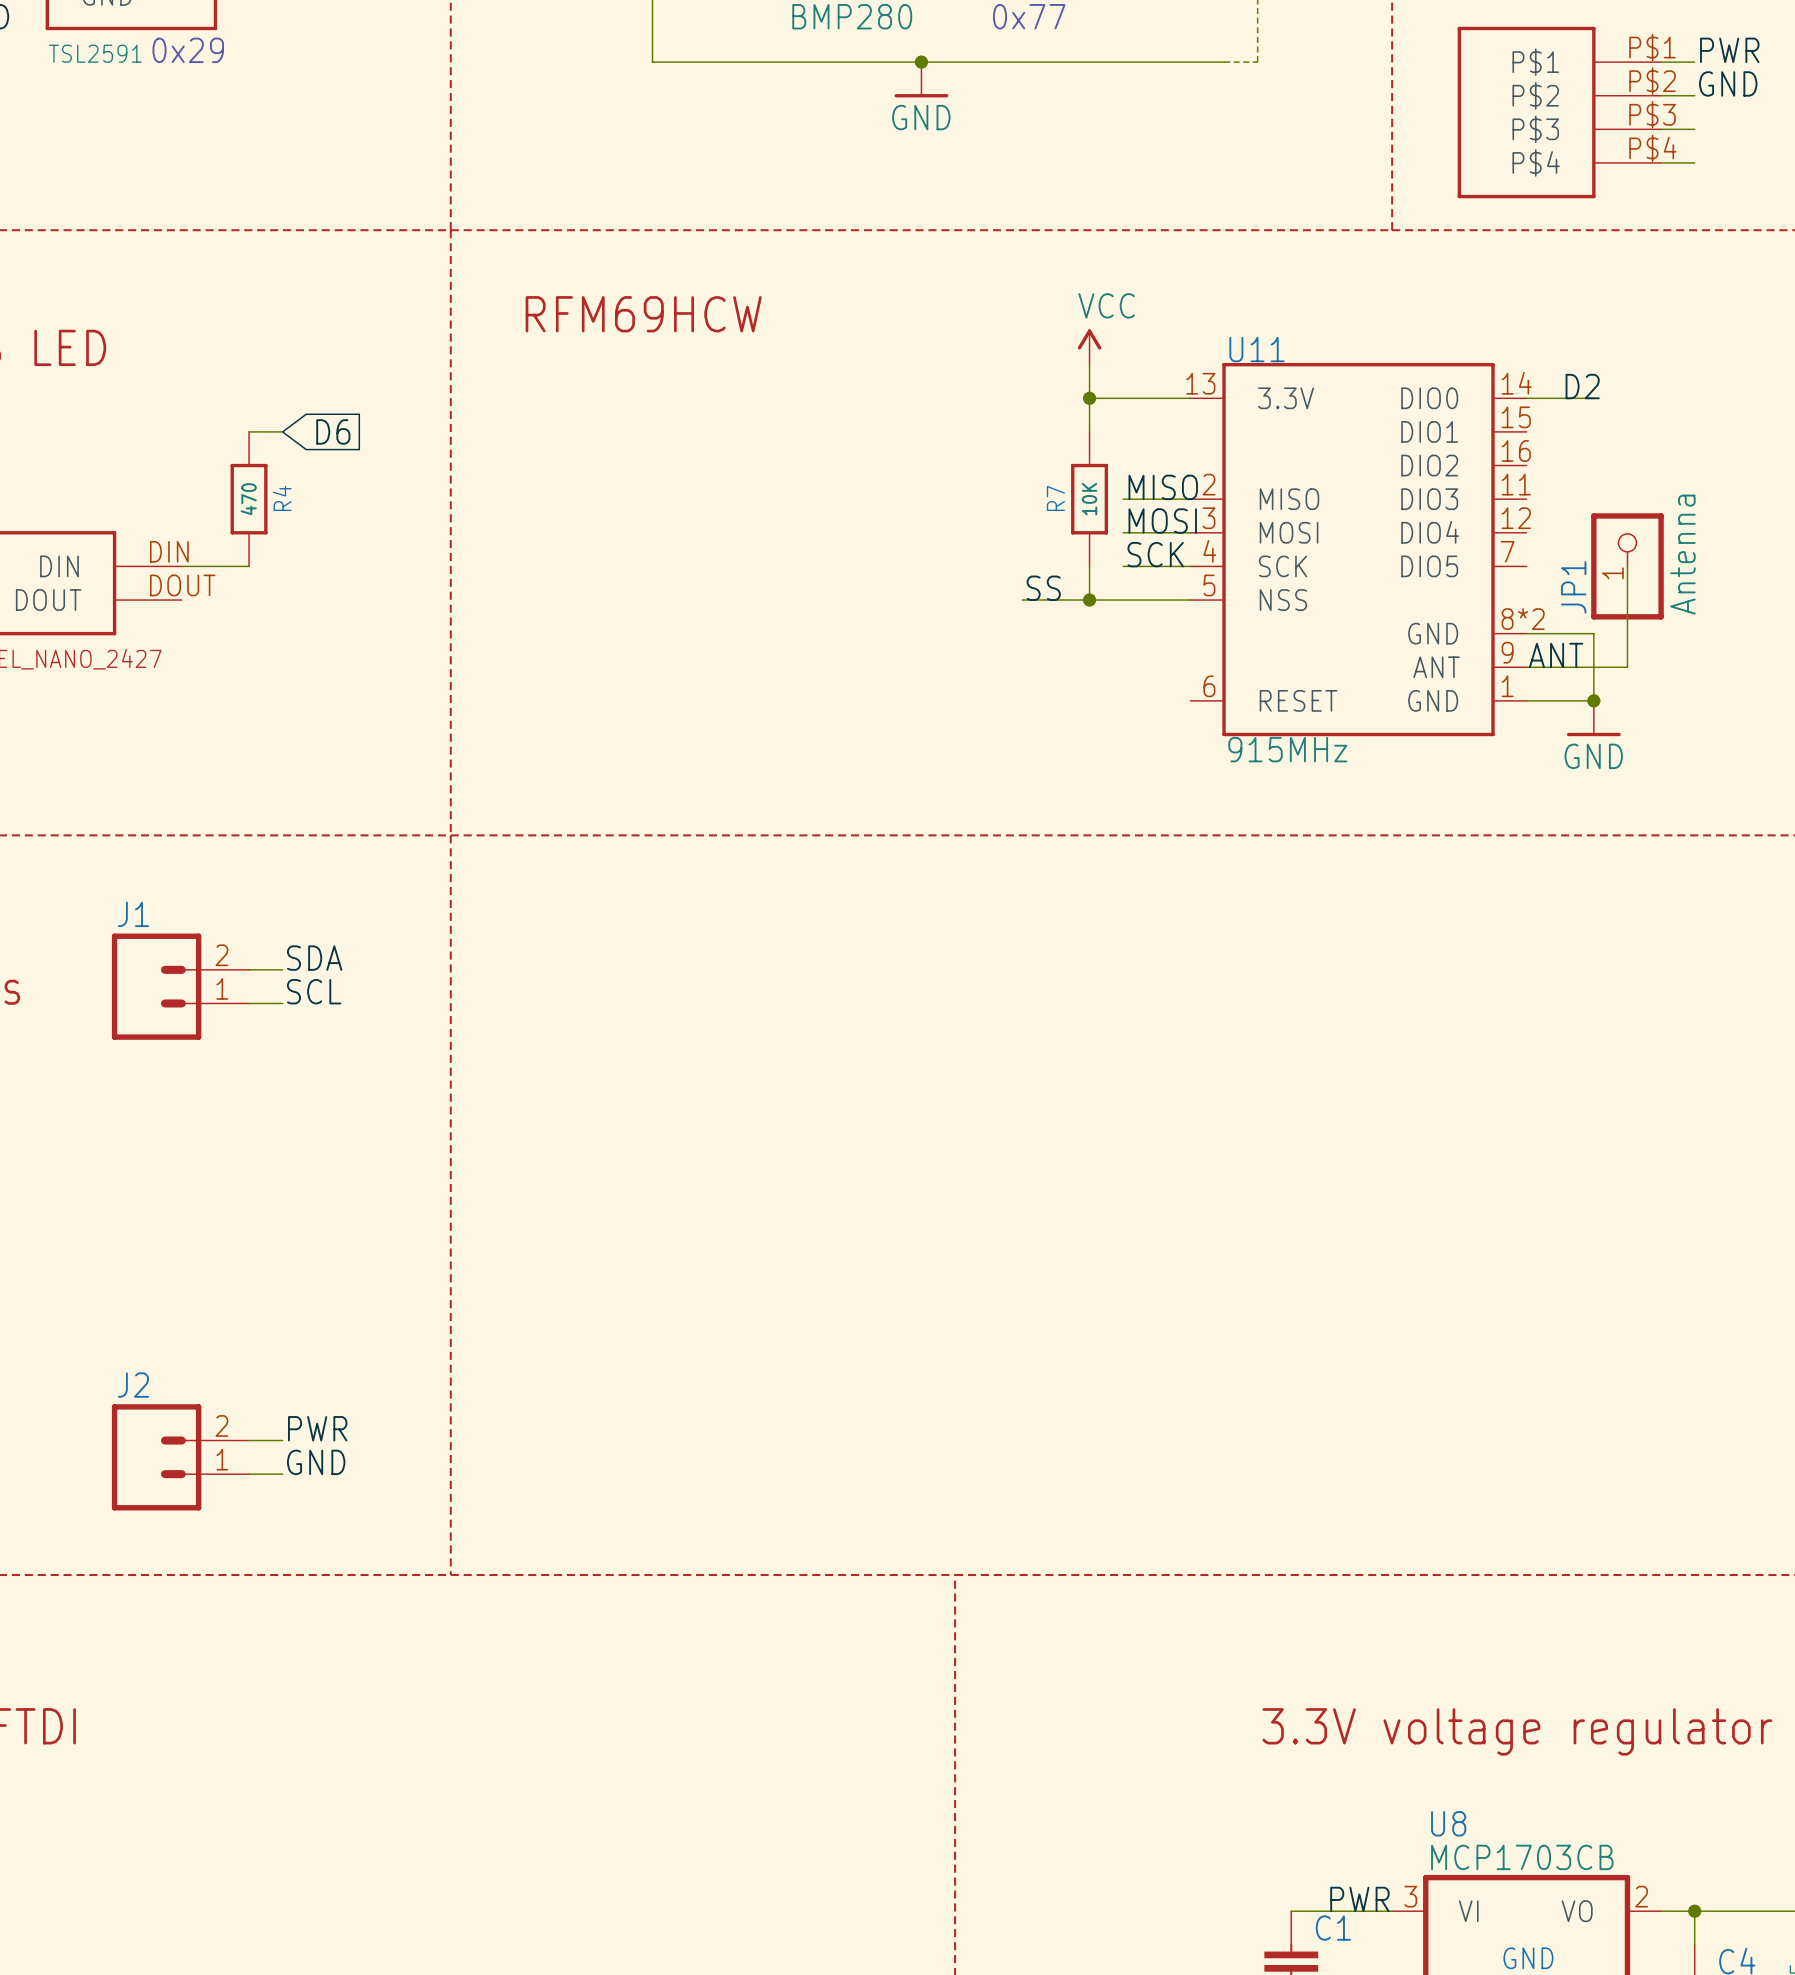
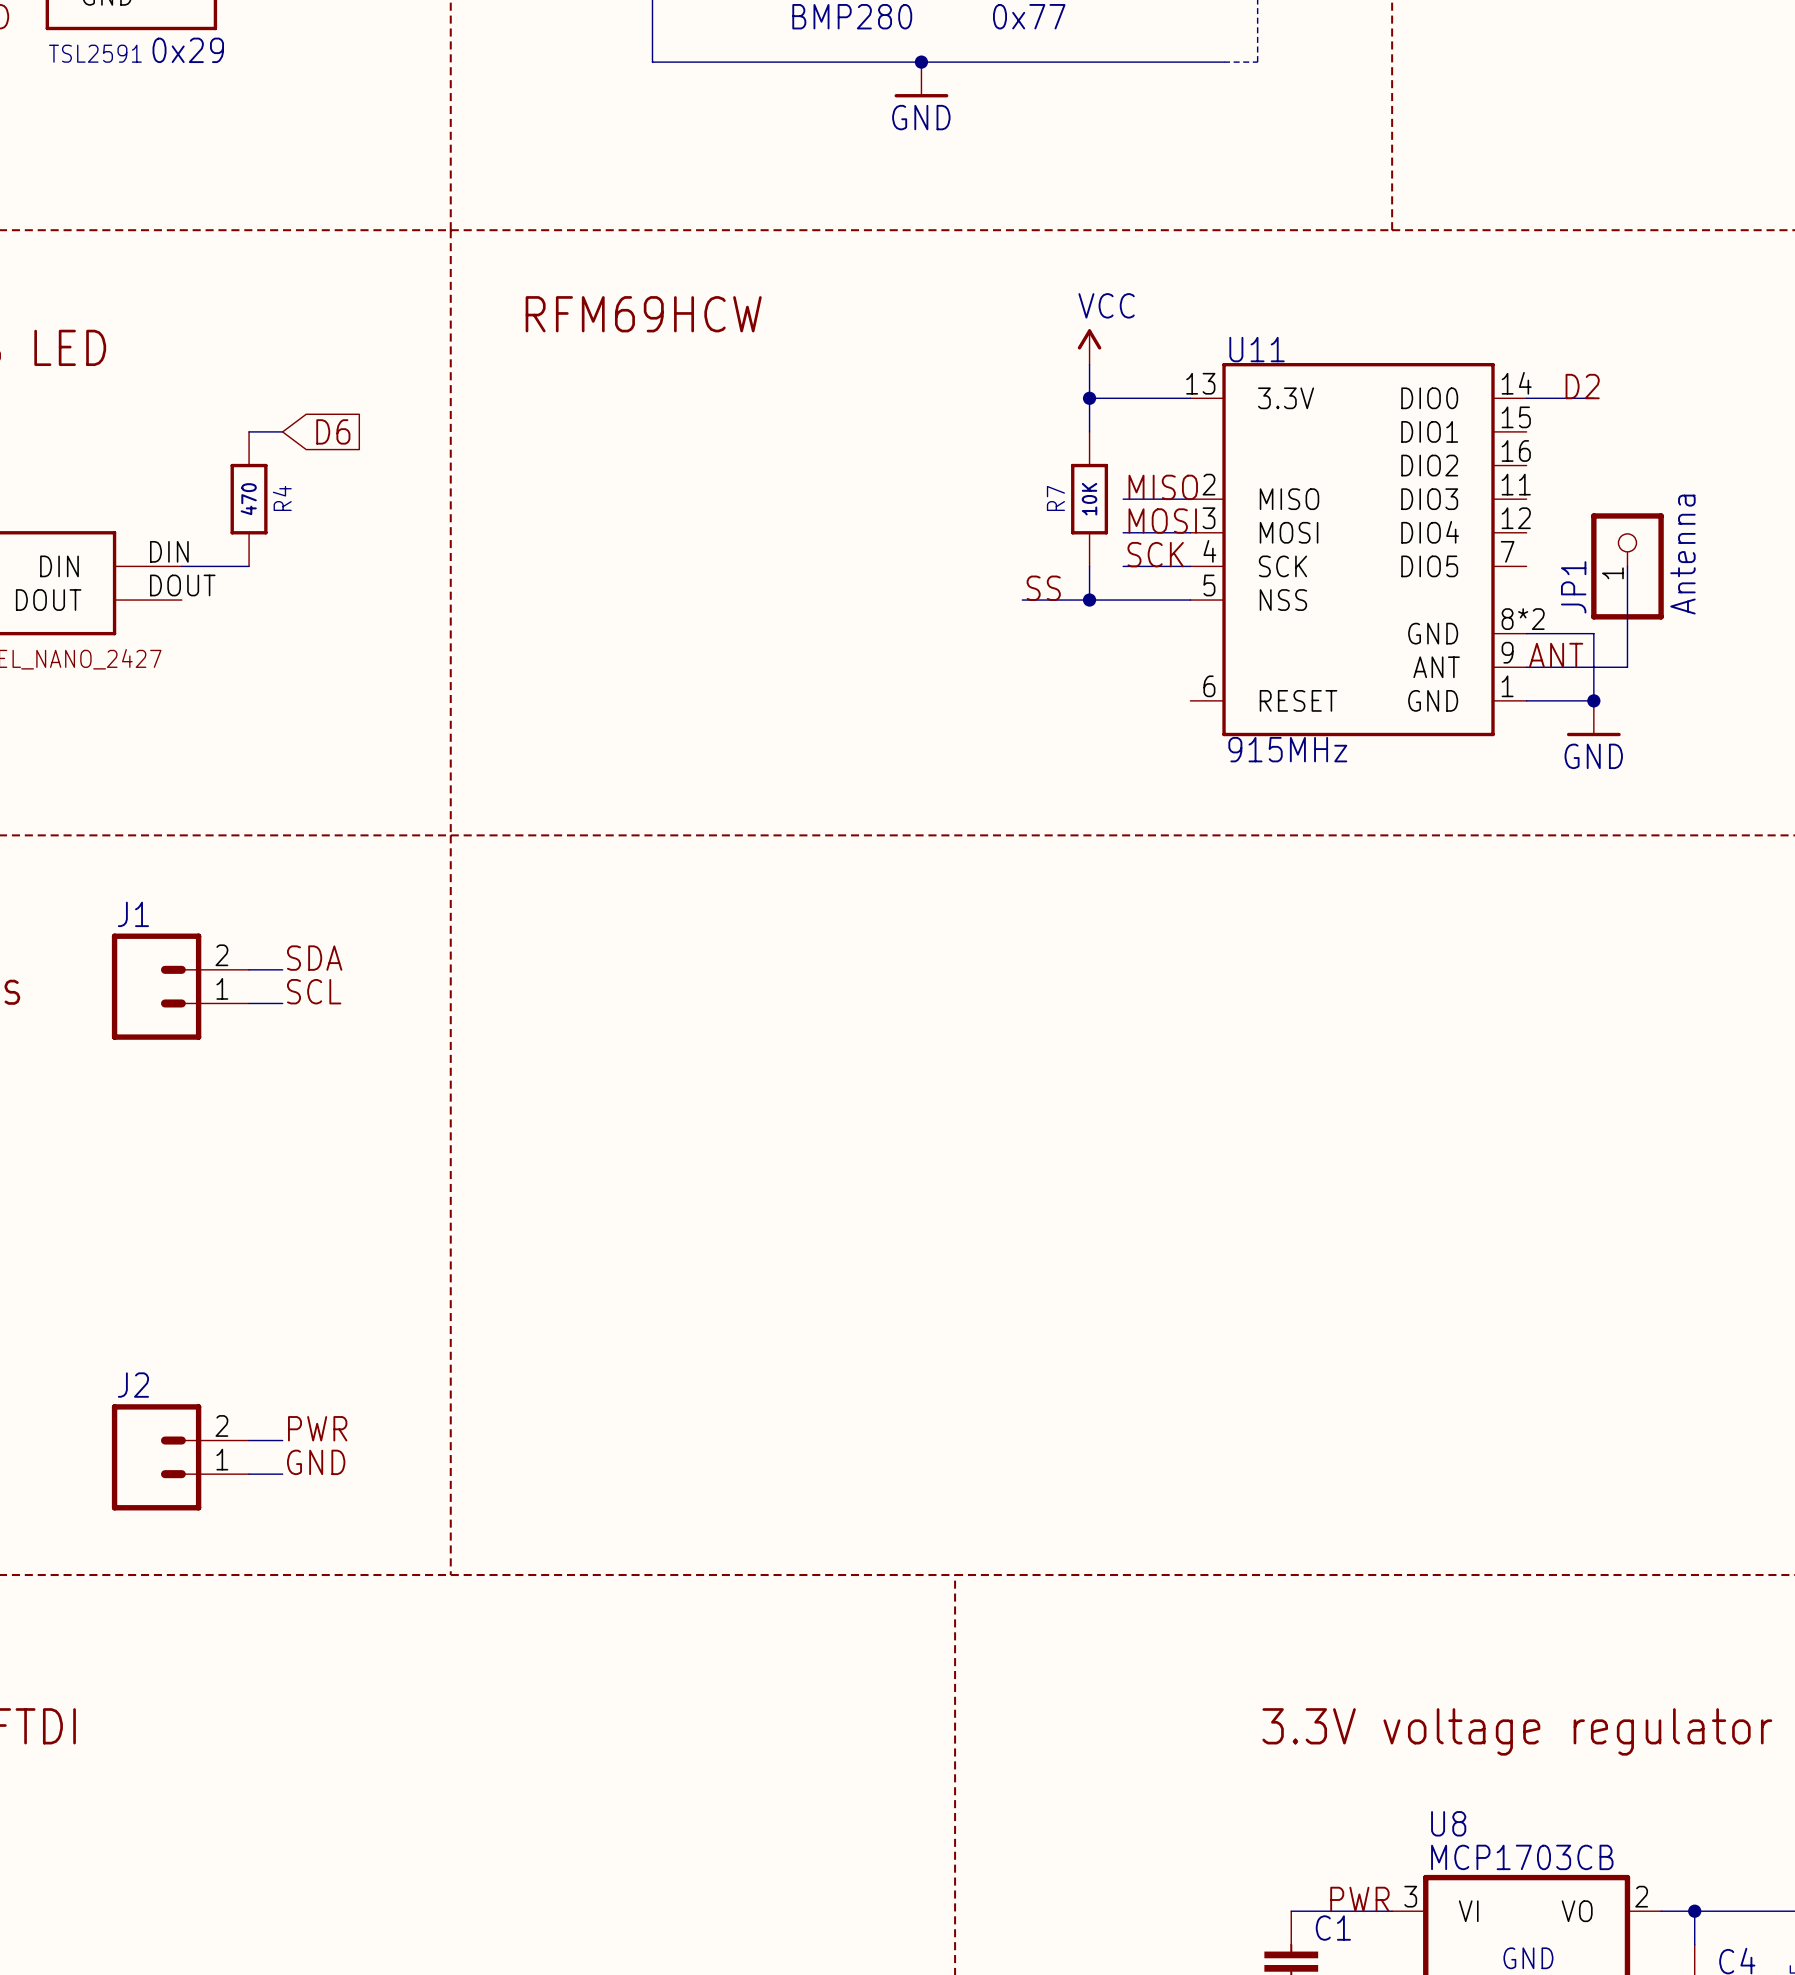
label: PWR (1729, 50) -> none
wire: (1661, 62) (1694, 62) -> none
label: GND (1728, 83) -> none
wire: (1661, 95) (1694, 95) -> none
part: (1559, 112) -> none
wire: (1661, 129) (1694, 129) -> none
wire: (1661, 162) (1694, 162) -> none

